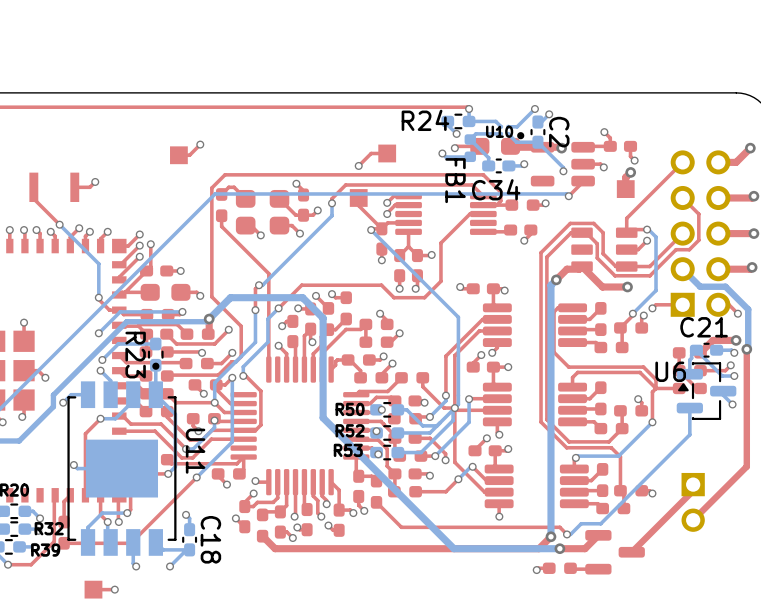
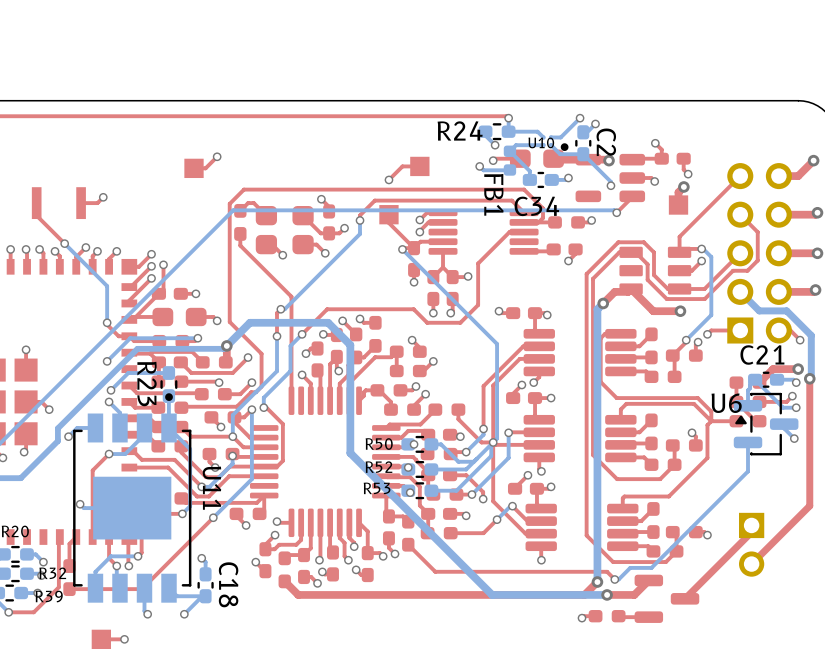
top track: (541, 422) (566, 447) (611, 447) (620, 456) (620, 490) -> (586, 457) (586, 535) (613, 562) (665, 562) (676, 551)
top track: none -> (707, 457) (668, 496) (624, 496)
bottom track: (652, 422) (618, 456) (577, 456) (575, 457) -> none
via: (652, 422) -> none
via: (575, 457) -> none

